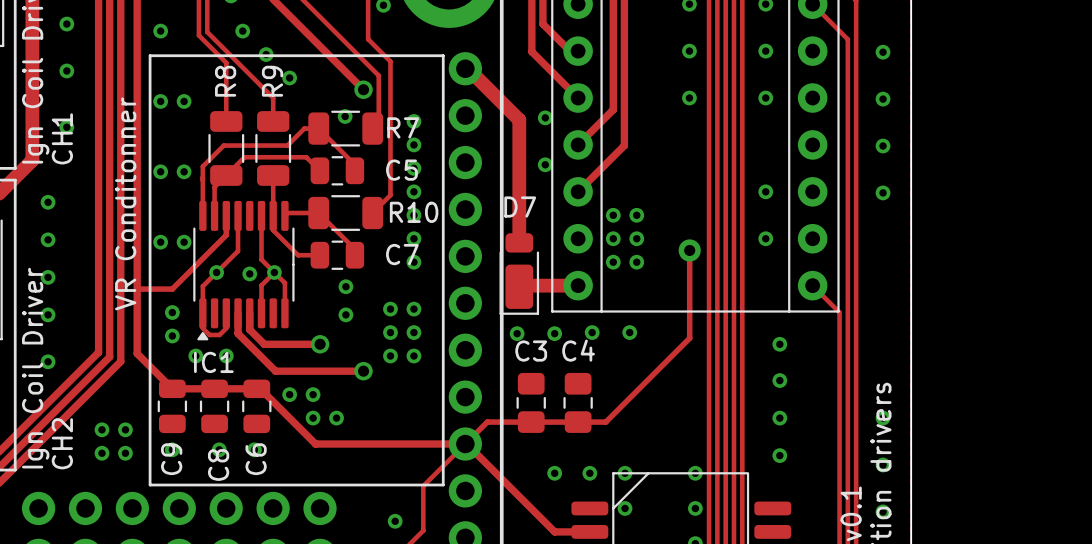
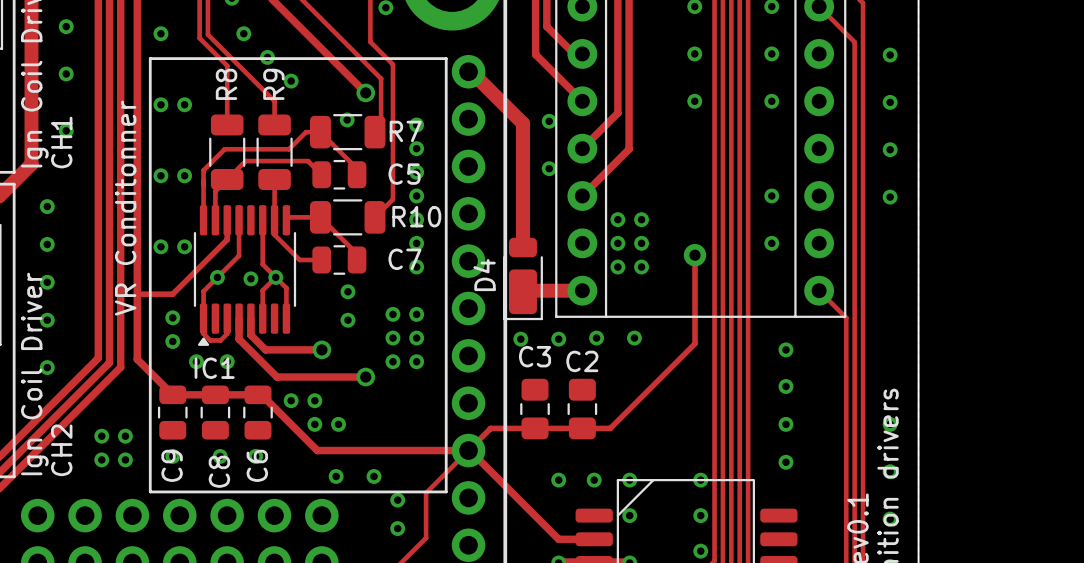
D7 name: D7 (520, 207) -> D4 (484, 275)
C4 name: C4 (578, 350) -> C2 (582, 361)
via: none -> (336, 476)
via: none -> (374, 476)
via: none -> (397, 500)

